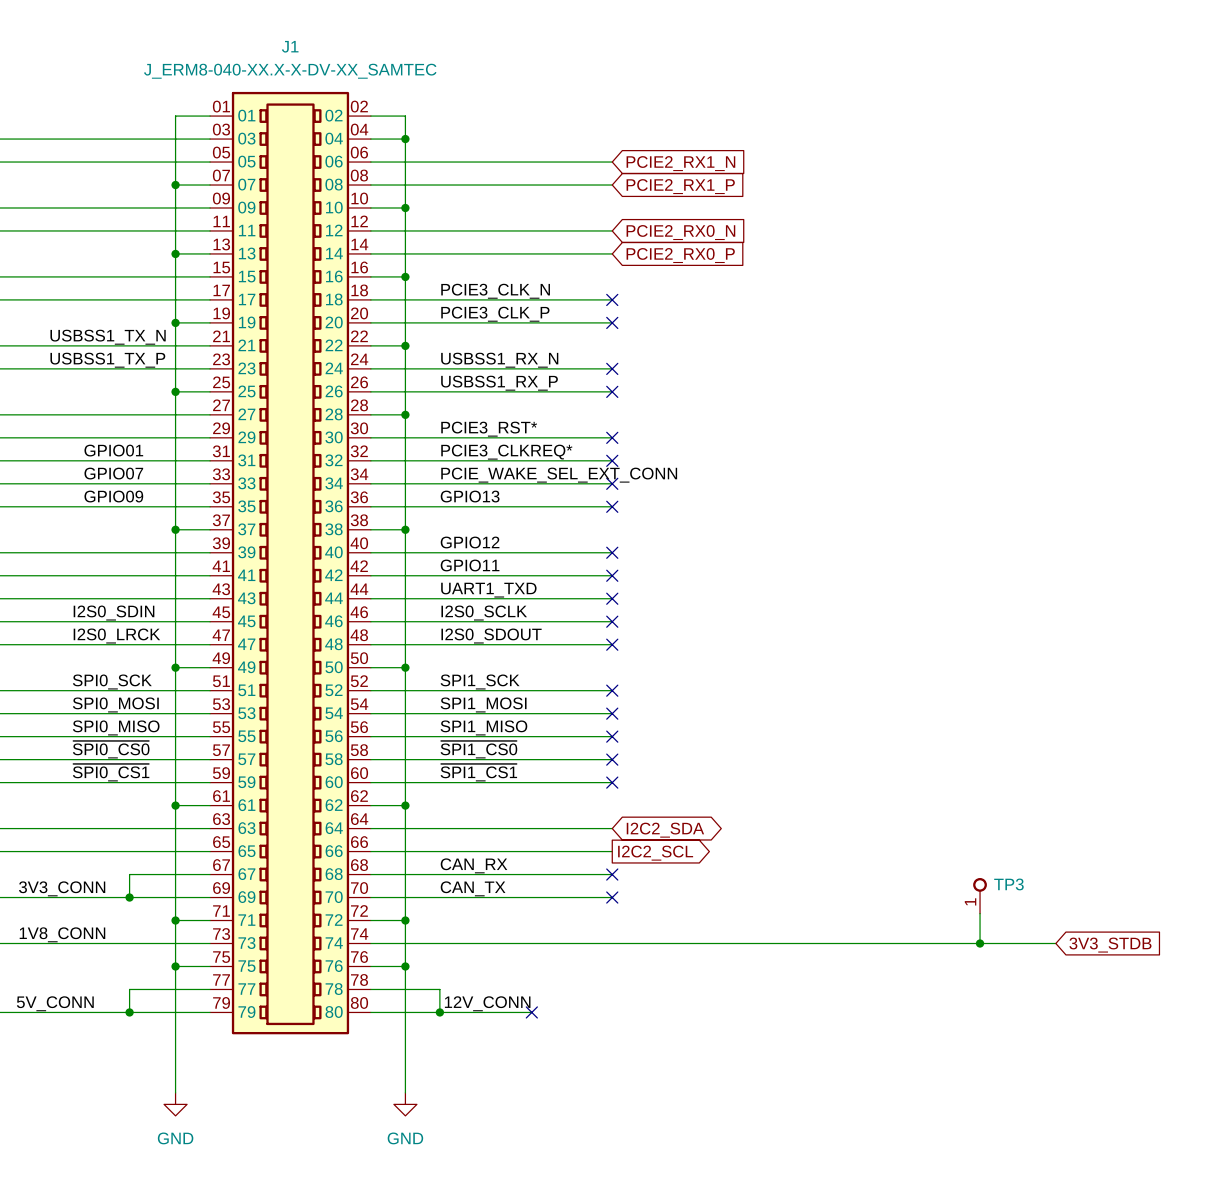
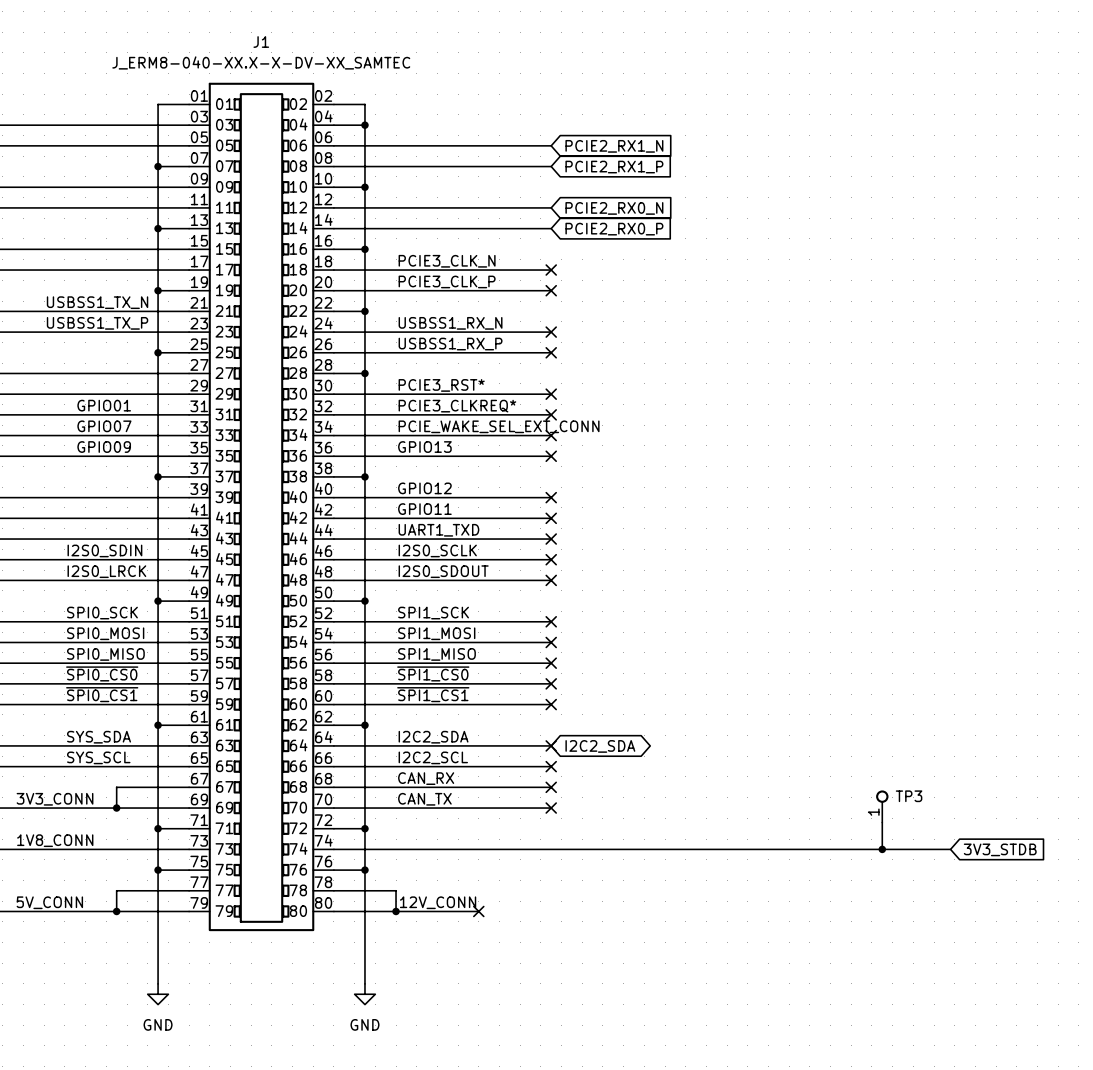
label: none -> SYS_SDA (99, 737)
label: none -> I2C2_SDA (433, 737)
no-connect mark: none -> (551, 745)
label: none -> SYS_SCL (98, 757)
label: none -> I2C2_SCL (433, 757)
no-connect mark: none -> (551, 766)
global label: I2C2_SCL (655, 853) -> none

